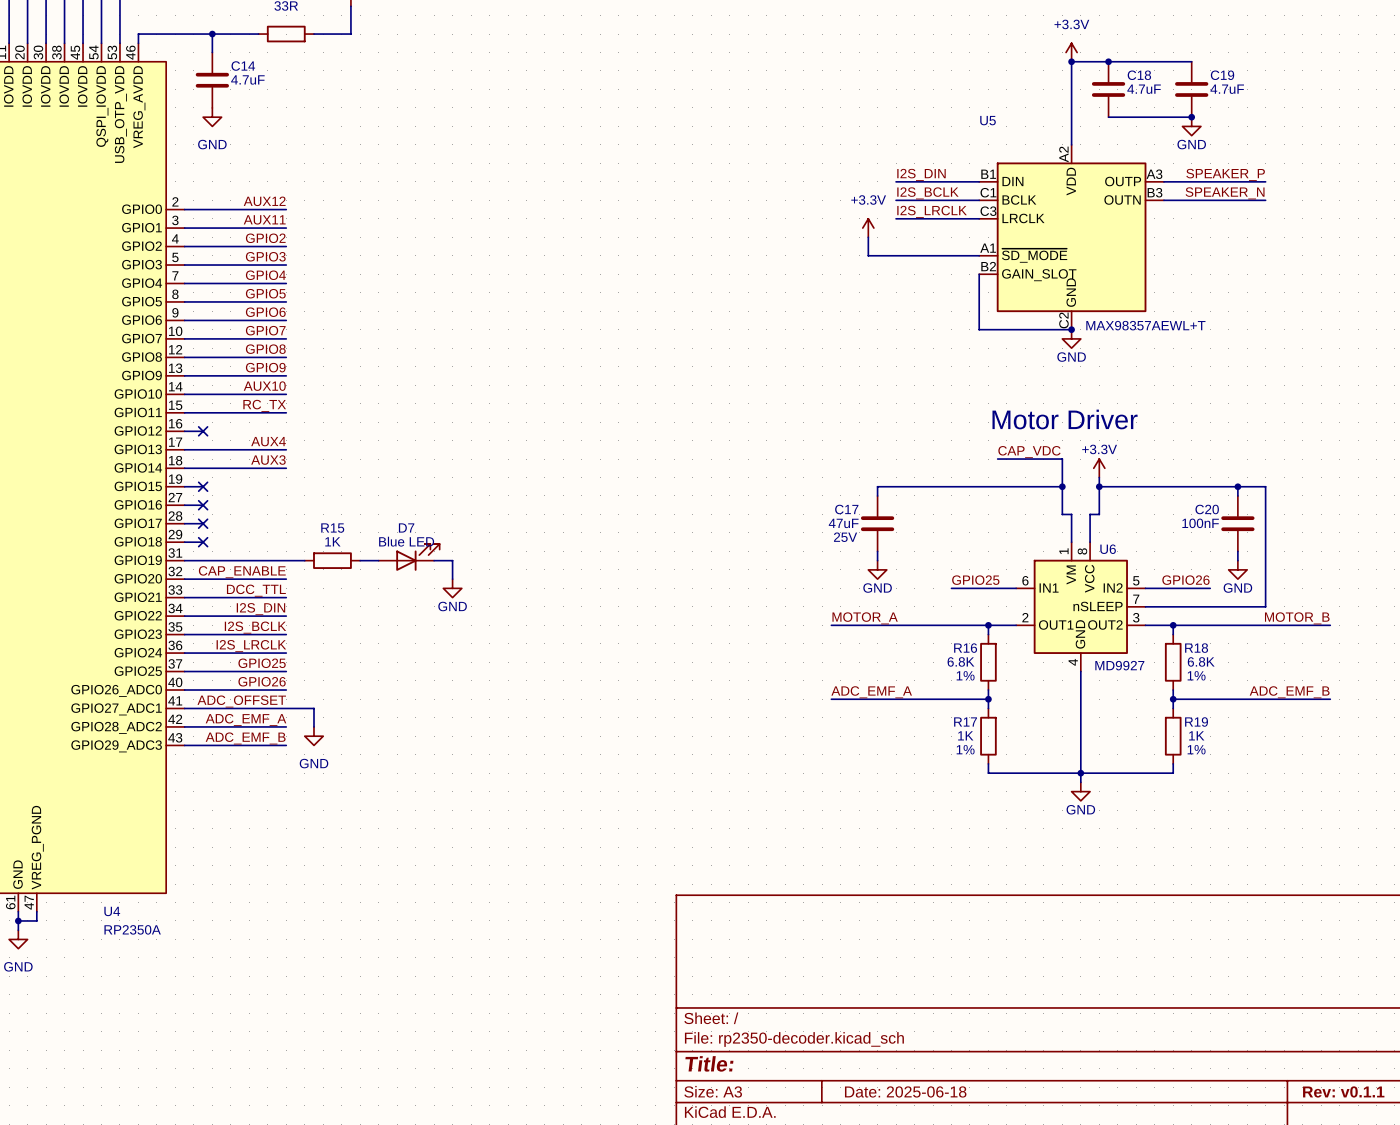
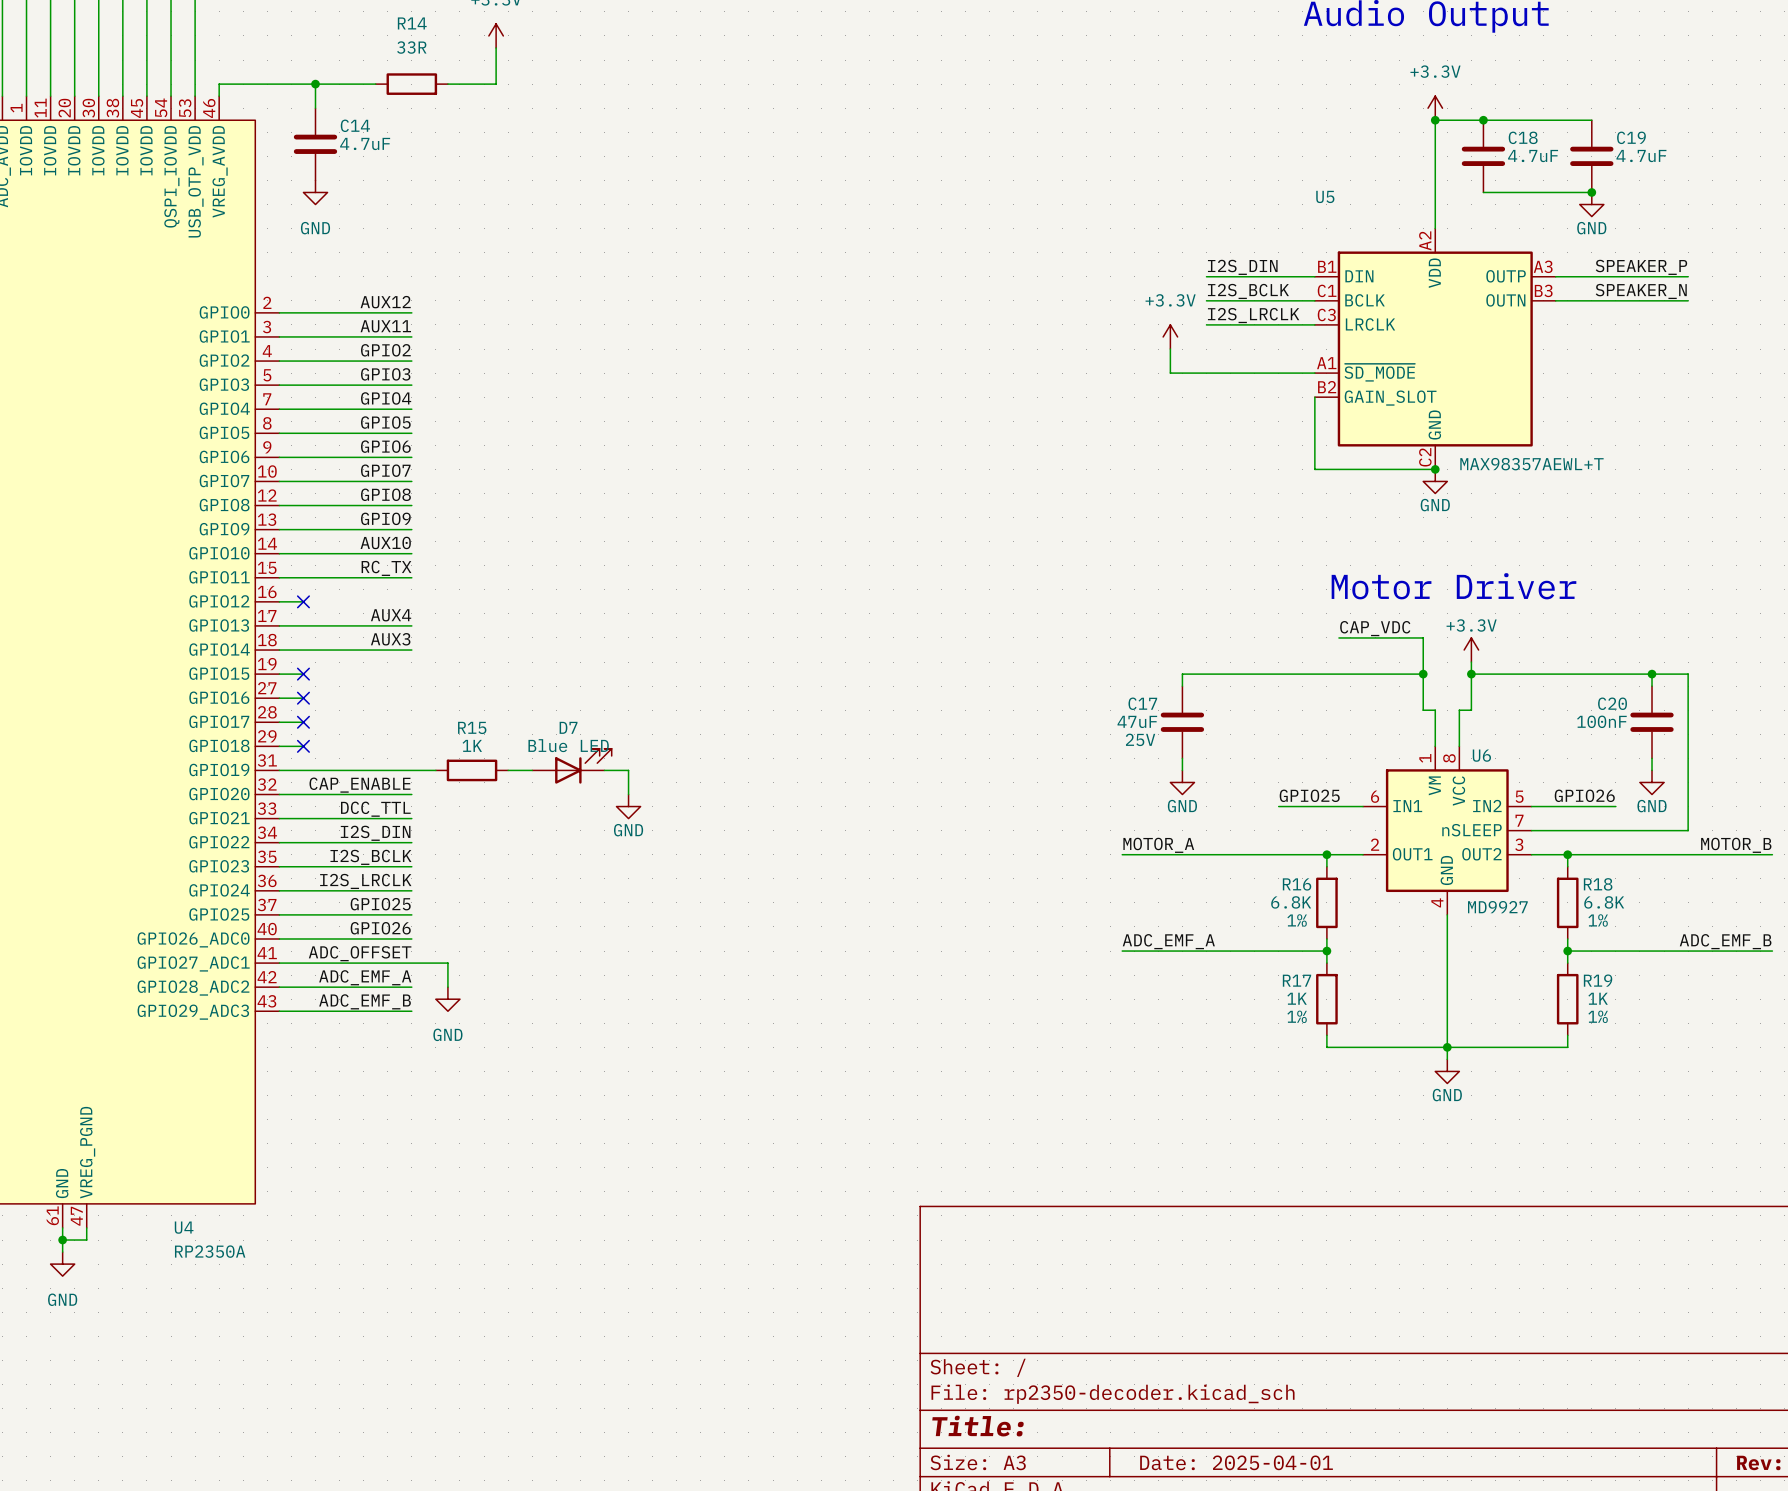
title block: Date: 2025-06-18 (905, 1091) -> Date: 2025-04-01 (1236, 1462)

